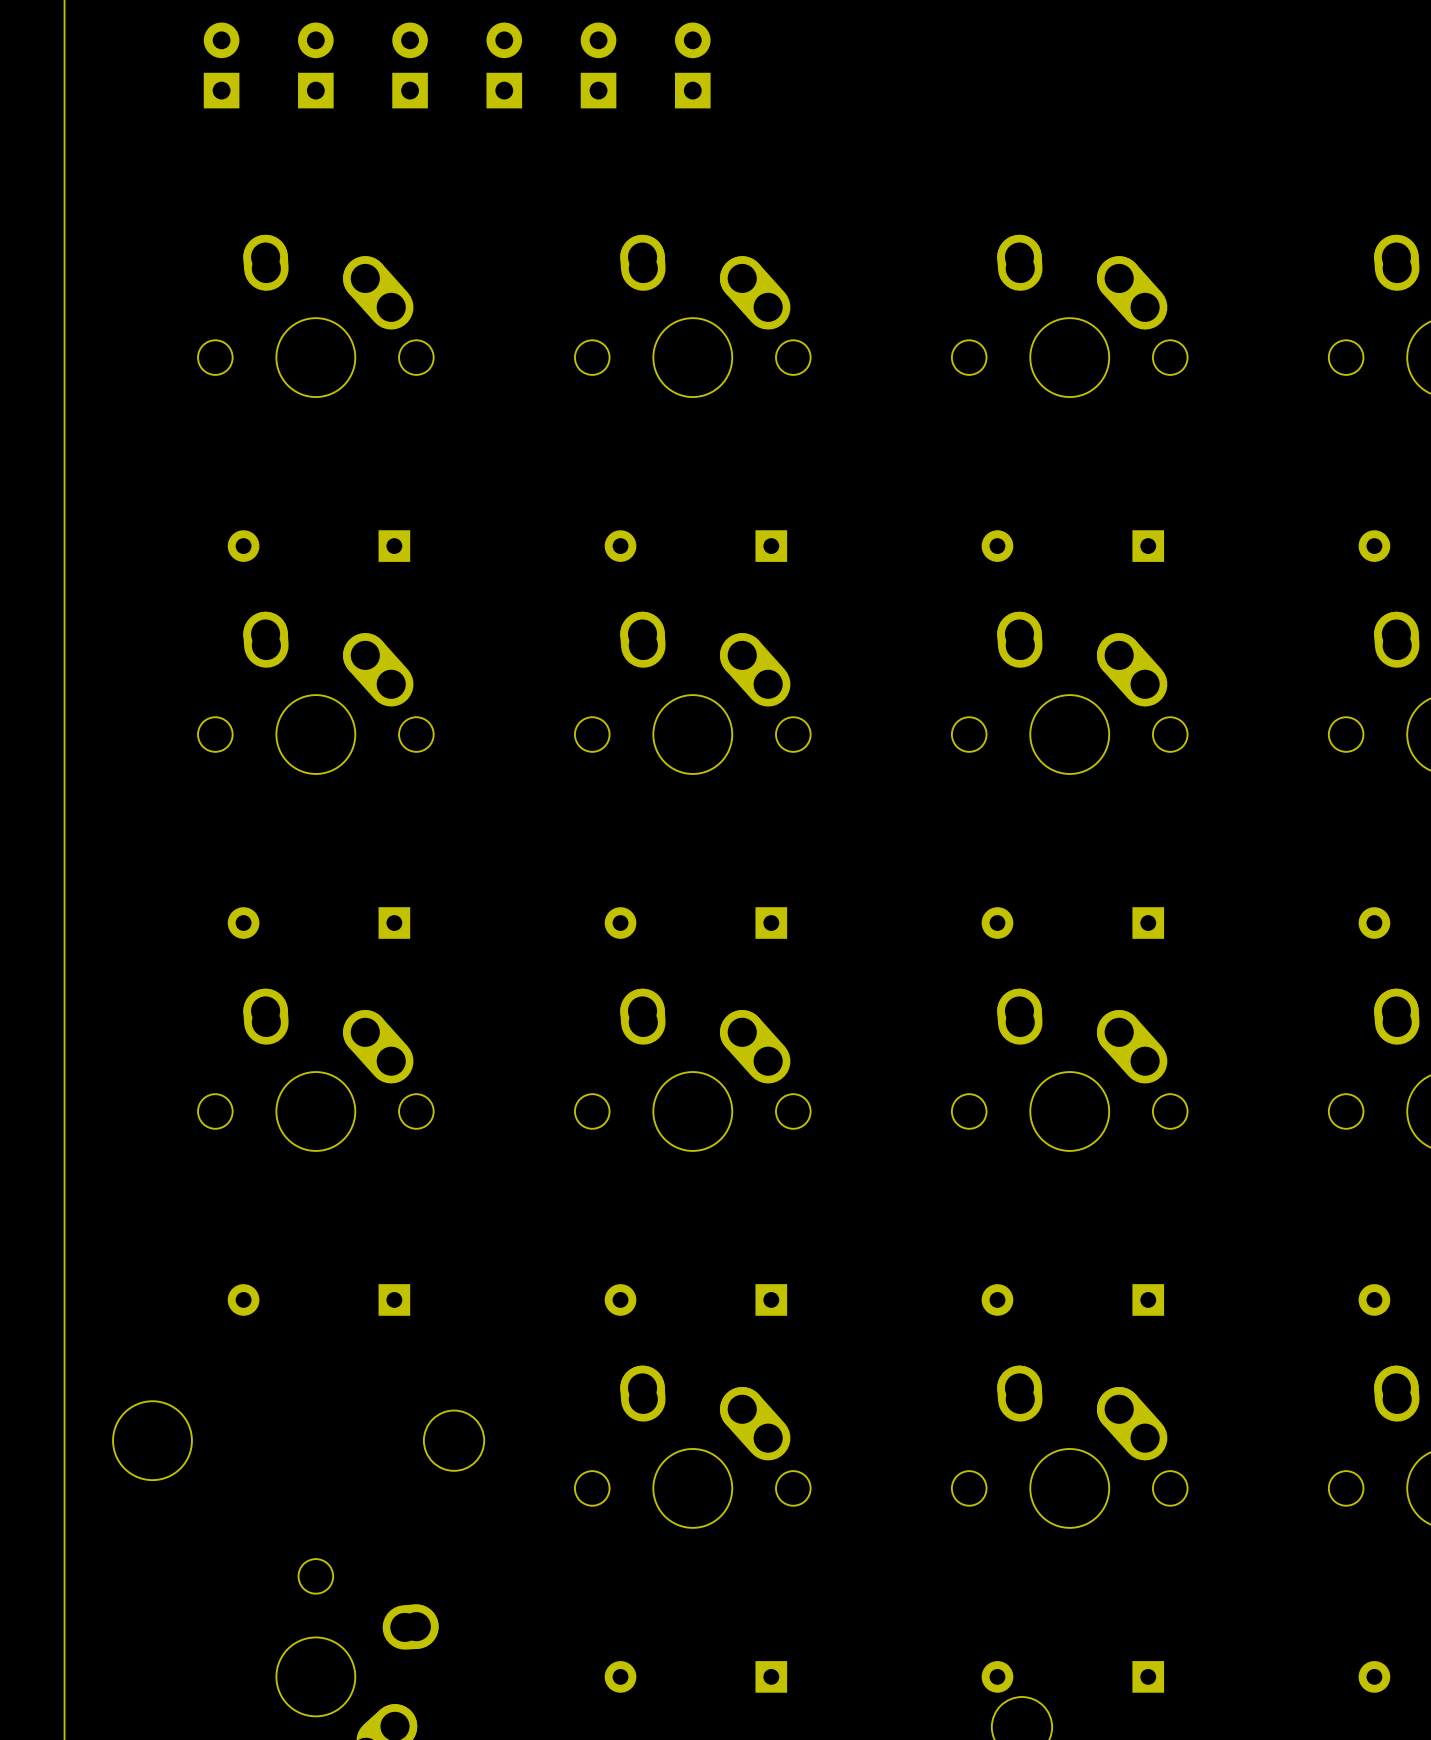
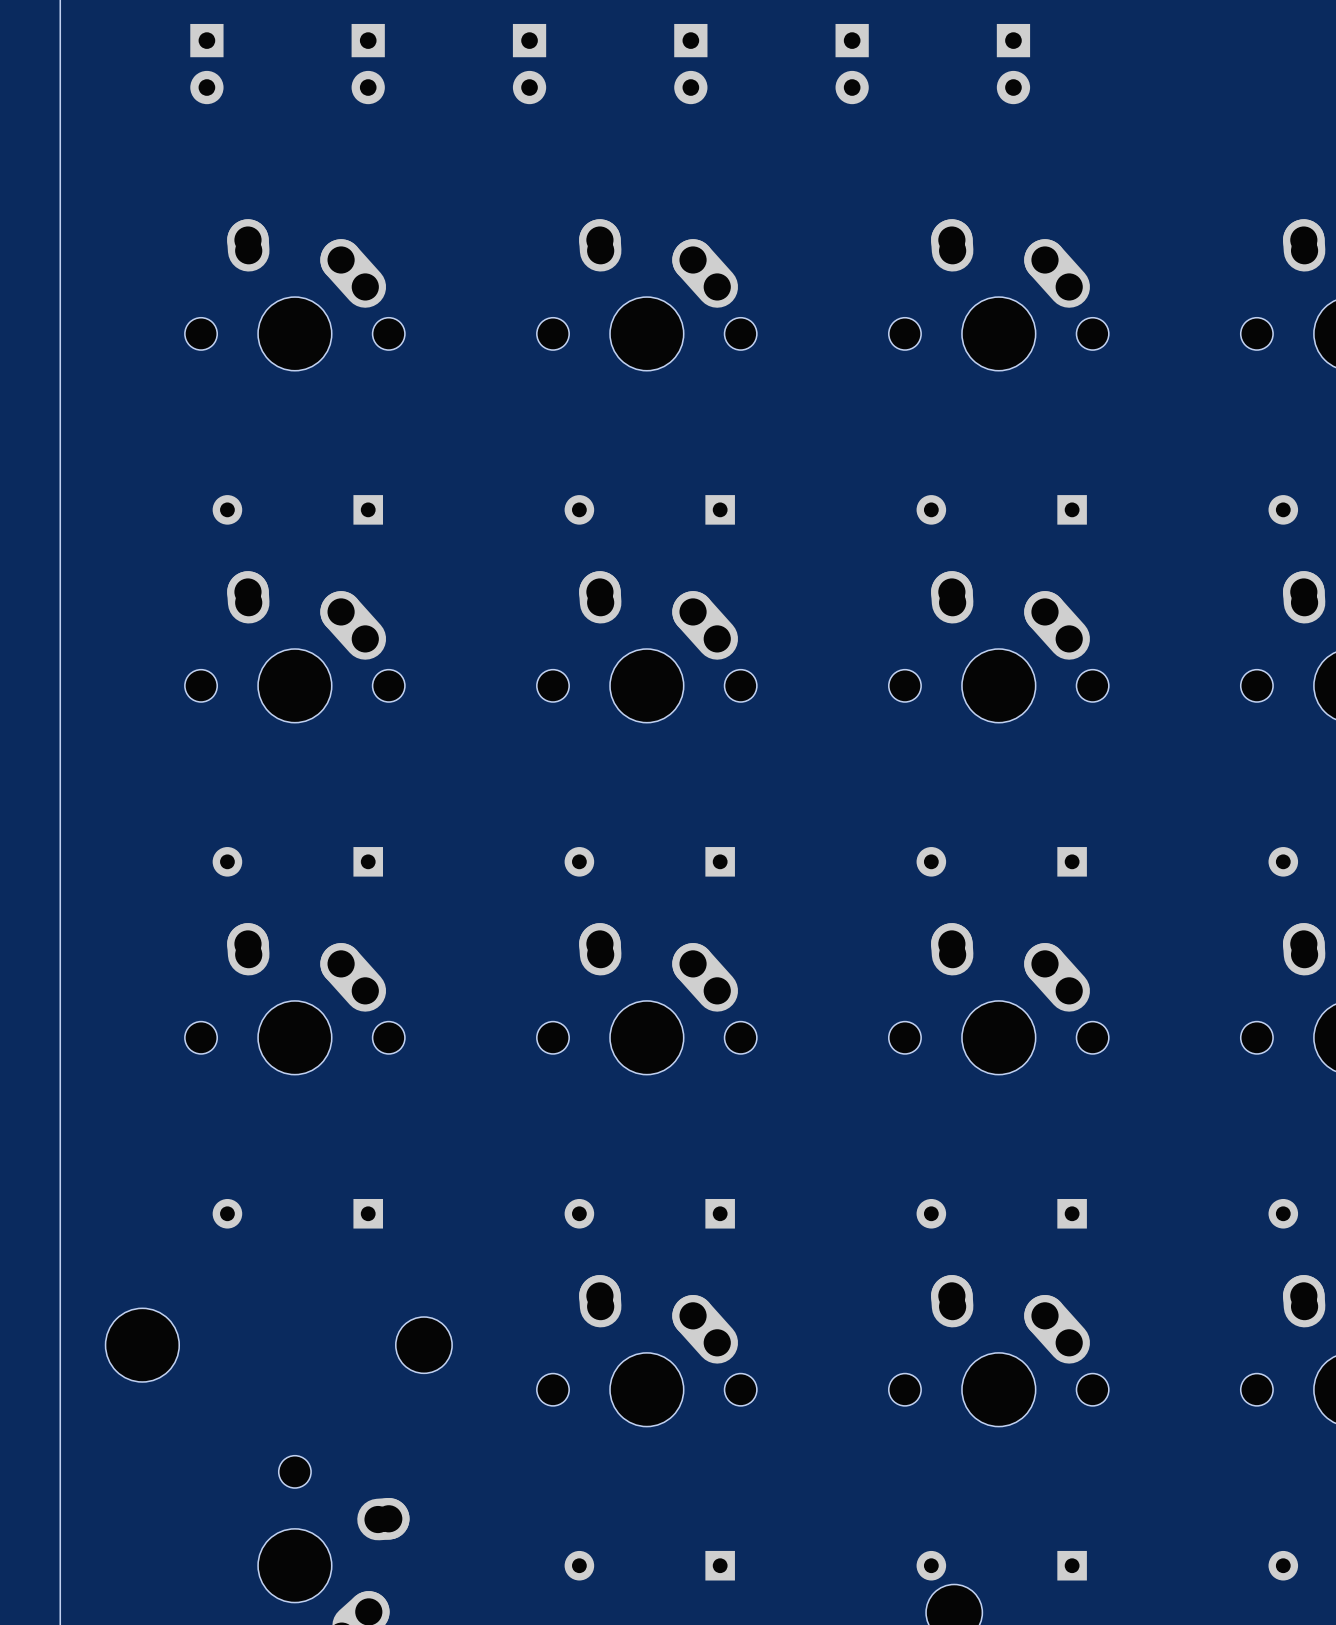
part rotation: 0° (221, 65) -> 180° (206, 64)
part: (315, 65) -> none
part rotation: 0° (410, 65) -> 180° (368, 64)
part: (504, 65) -> none
part: (598, 65) -> none
part rotation: 0° (692, 65) -> 180° (690, 64)
part: none -> (529, 64)
part: none -> (852, 64)
part: none -> (1013, 64)

